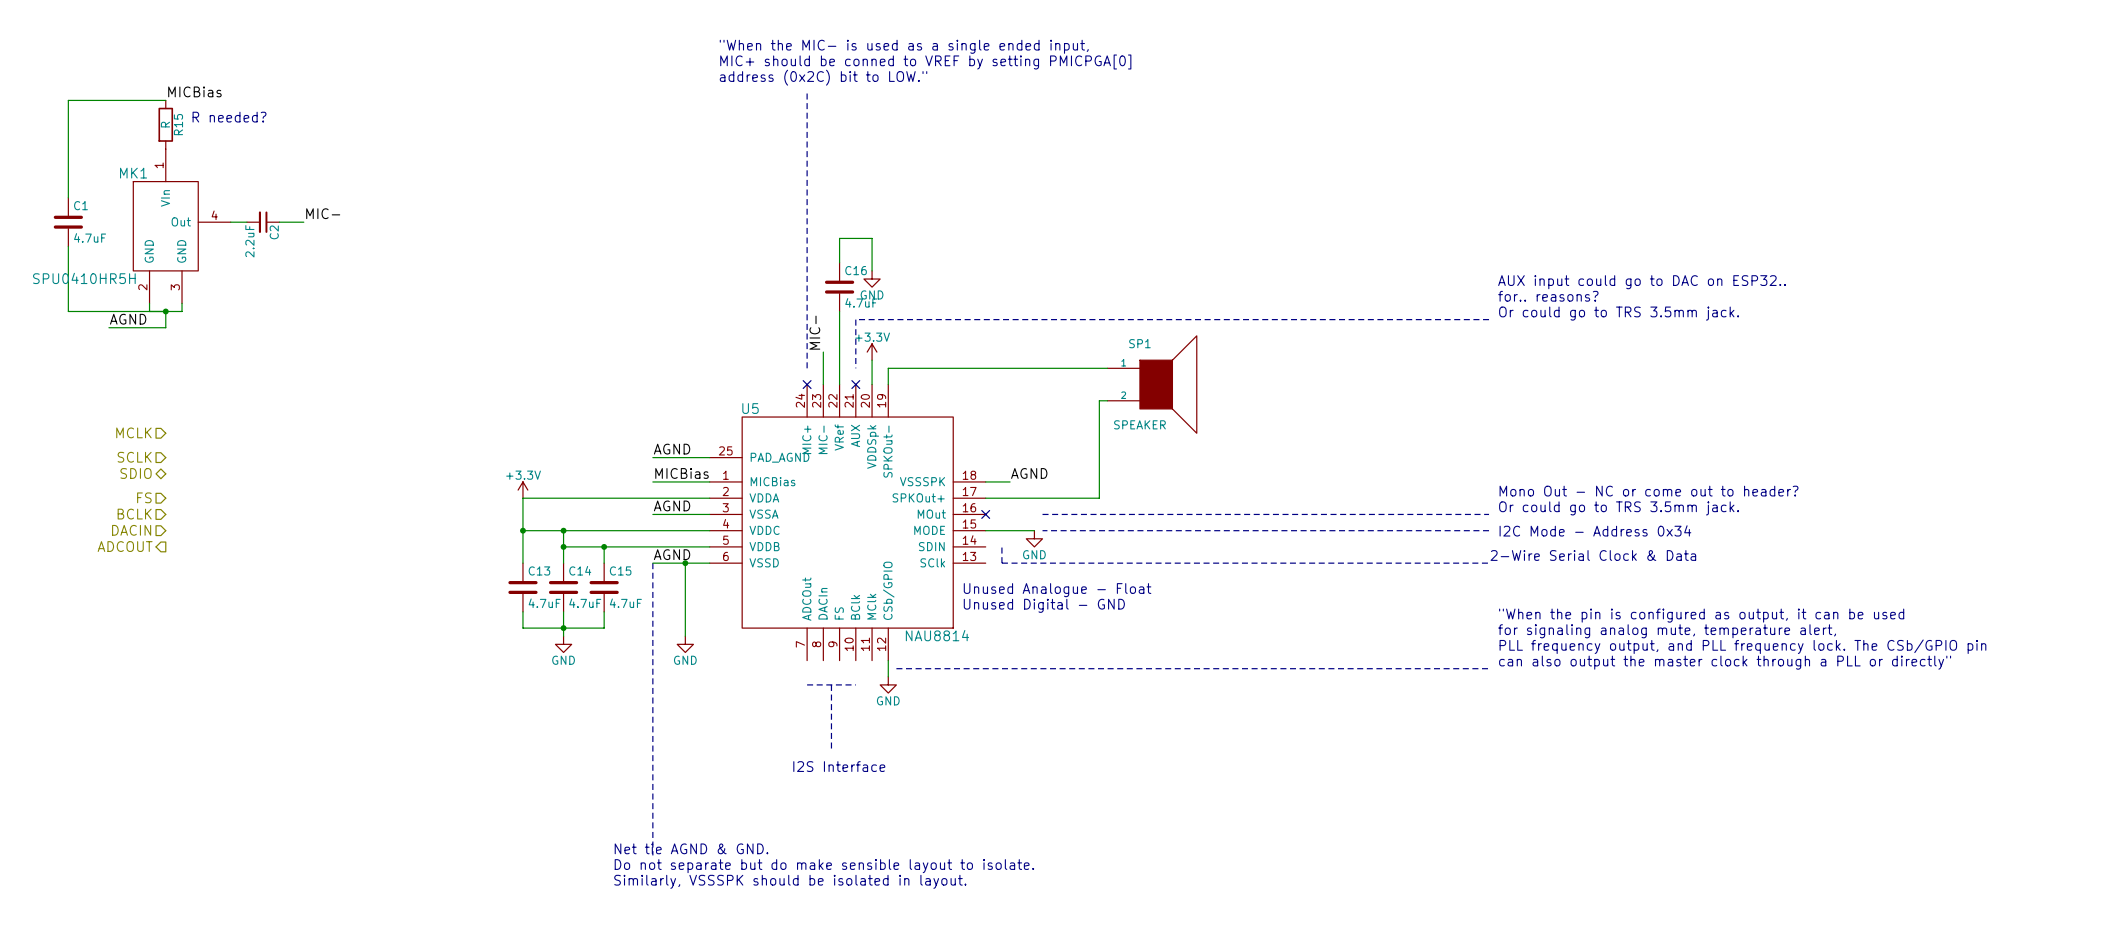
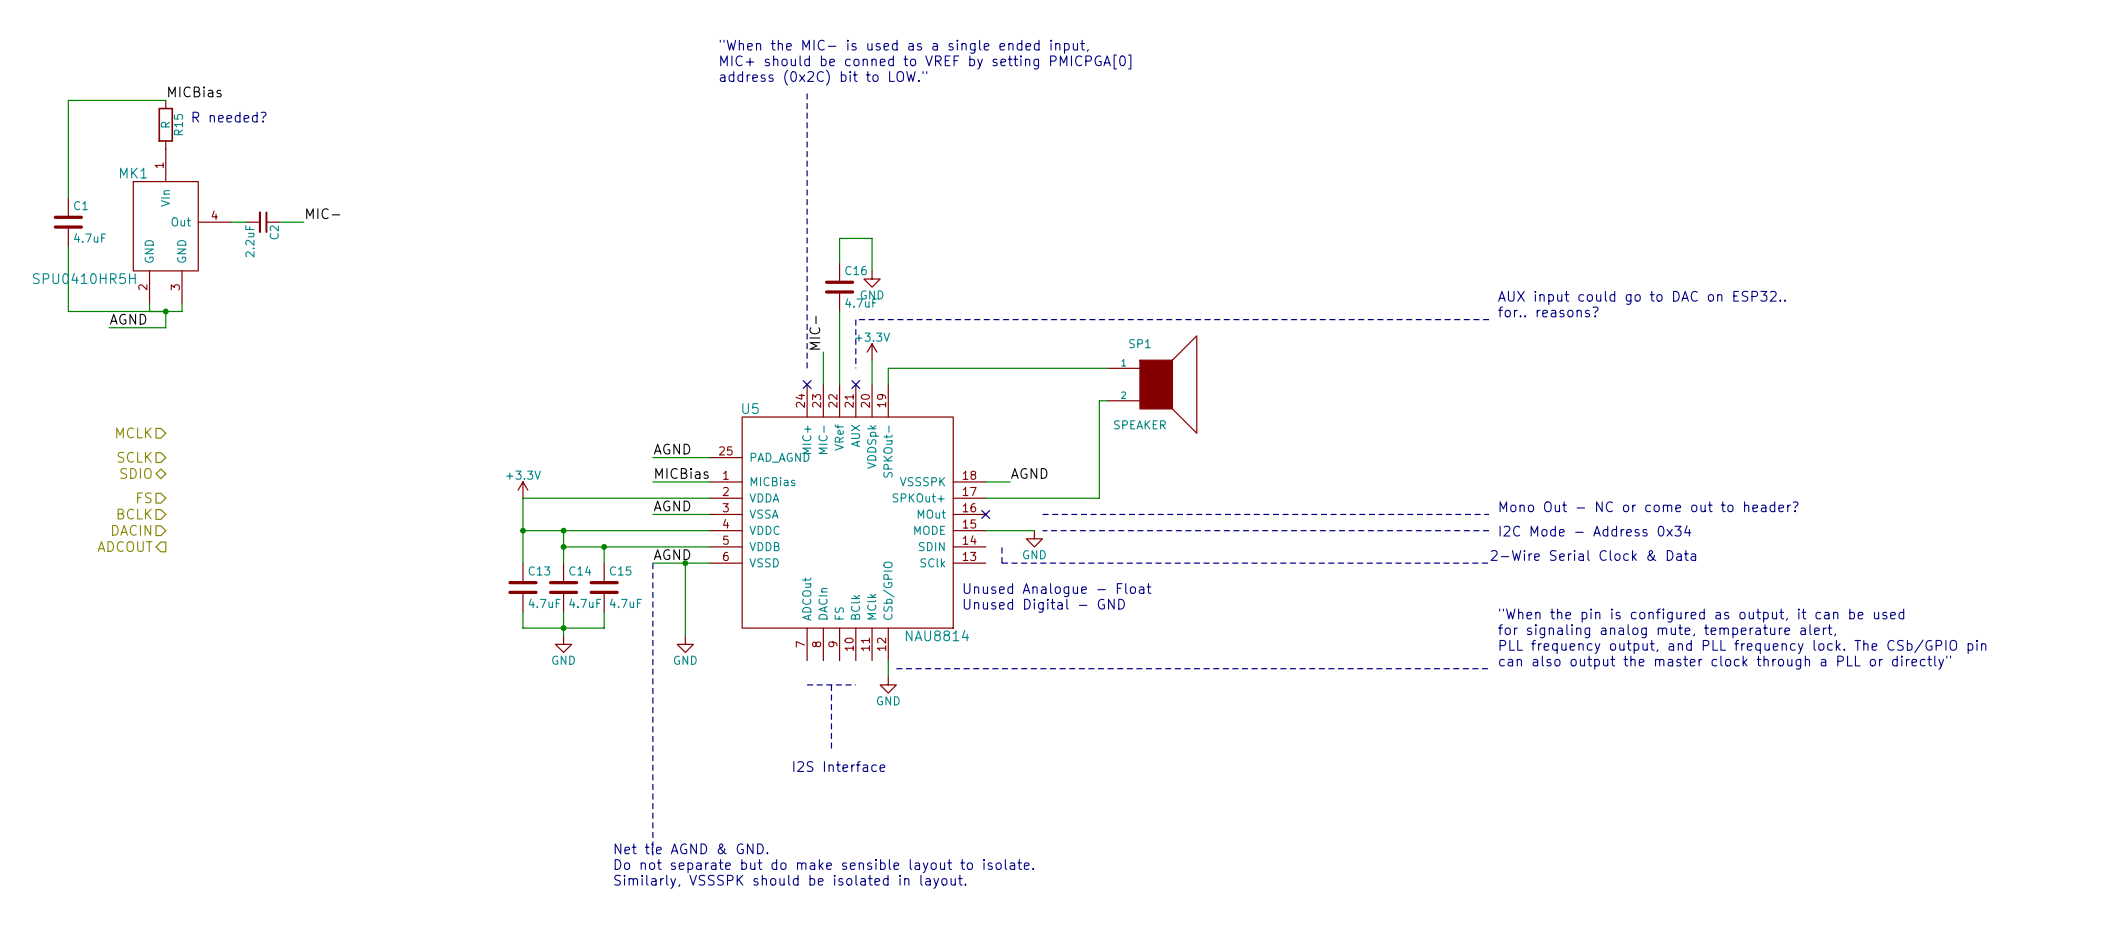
text: AUX input could go to DAC on ESP32.. (1642, 282) -> none
text: for.. reasons? (1548, 296) -> AUX input could go to DAC on ESP32.. (1642, 297)
text: Or could go to TRS 3.5mm jack. (1619, 313) -> for.. reasons? (1548, 311)
text: Mono Out - NC or come out to header? (1649, 491) -> none
text: Or could go to TRS 3.5mm jack. (1619, 508) -> Mono Out - NC or come out to header? (1649, 506)

